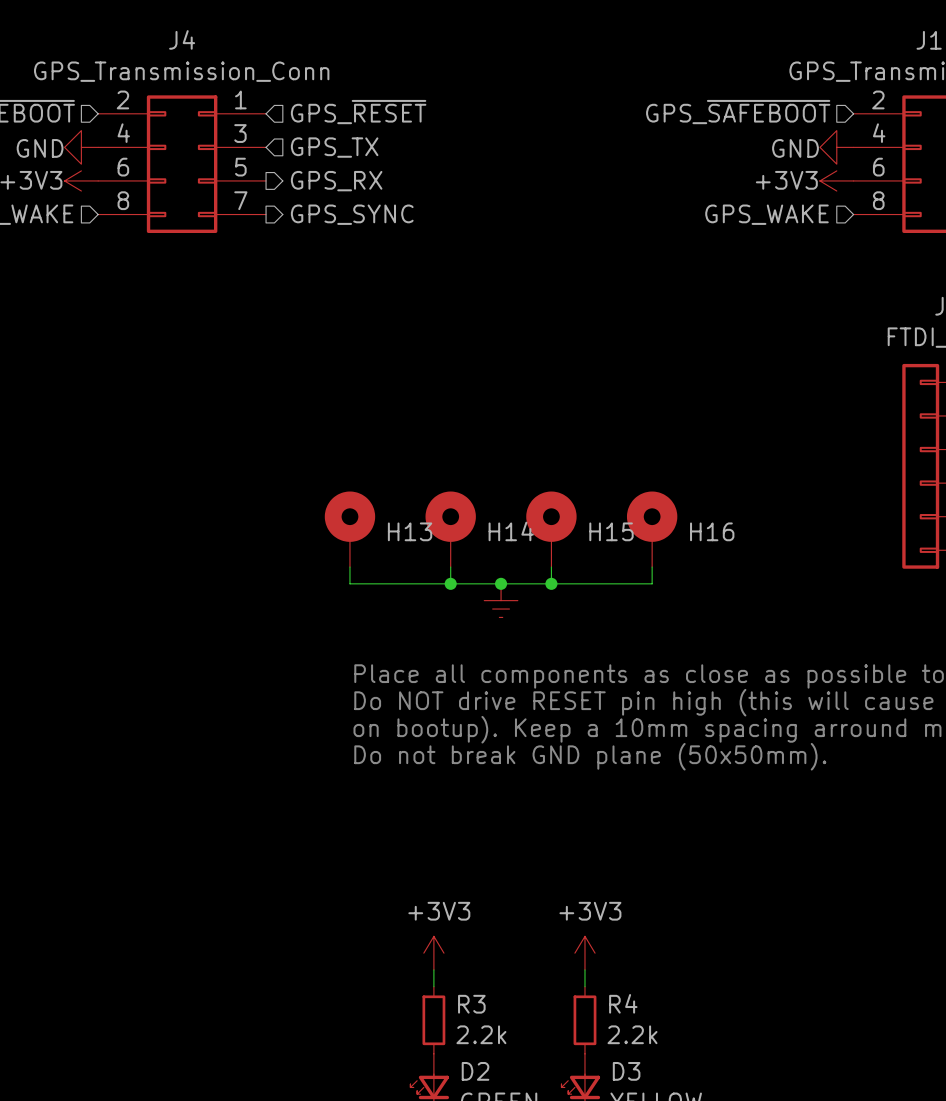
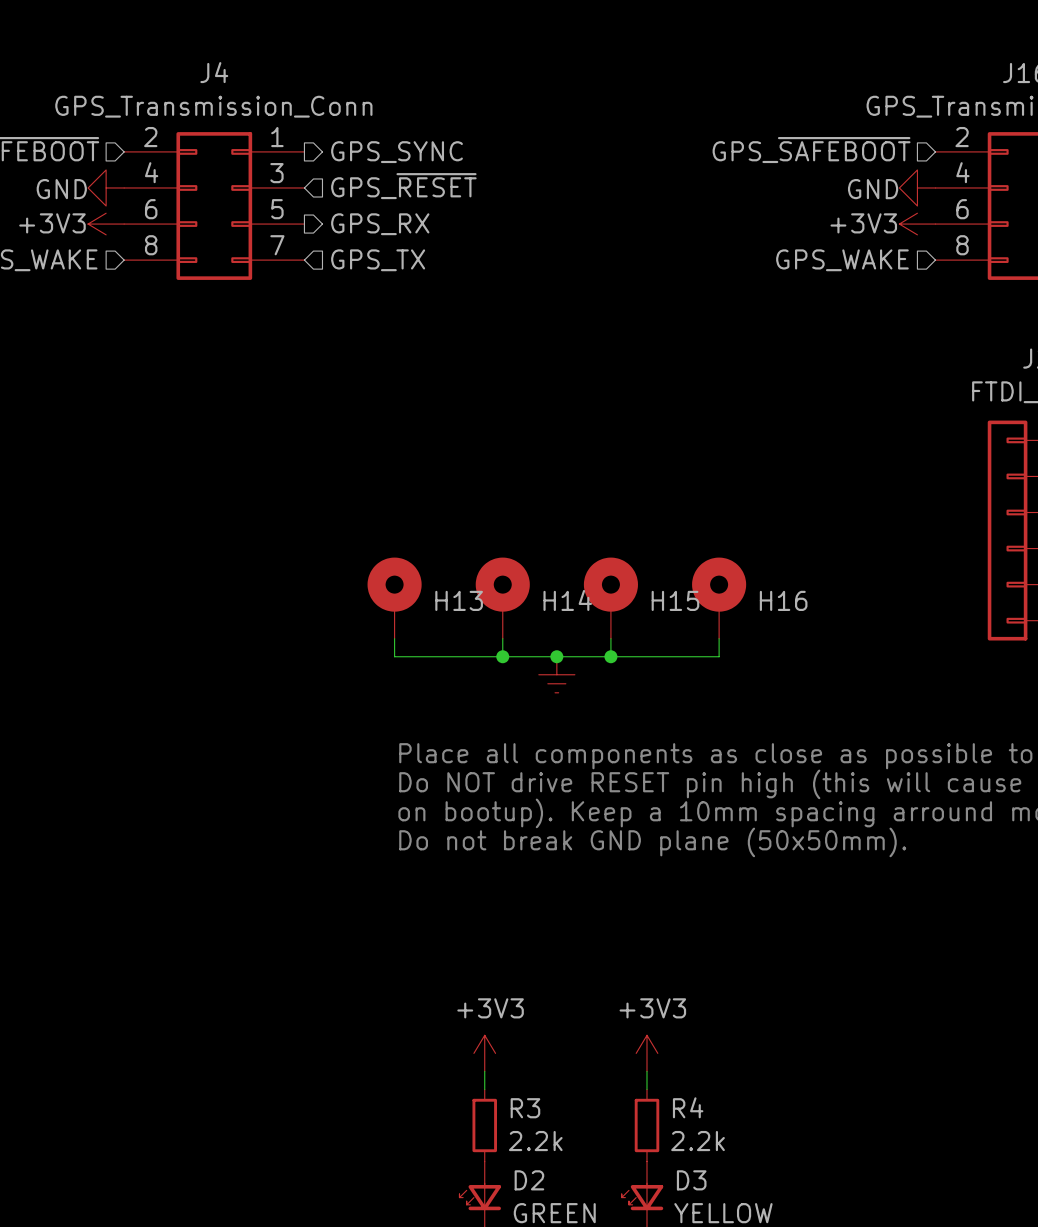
hierarchical label shape: input (358, 112) -> output (397, 152)
hierarchical label: GPS_~{RESET} (358, 112) -> GPS_SYNC (397, 152)
hierarchical label: GPS_TX (334, 147) -> GPS_~{RESET} (403, 186)
hierarchical label shape: output (352, 214) -> input (378, 260)
hierarchical label: GPS_SYNC (352, 214) -> GPS_TX (378, 260)

